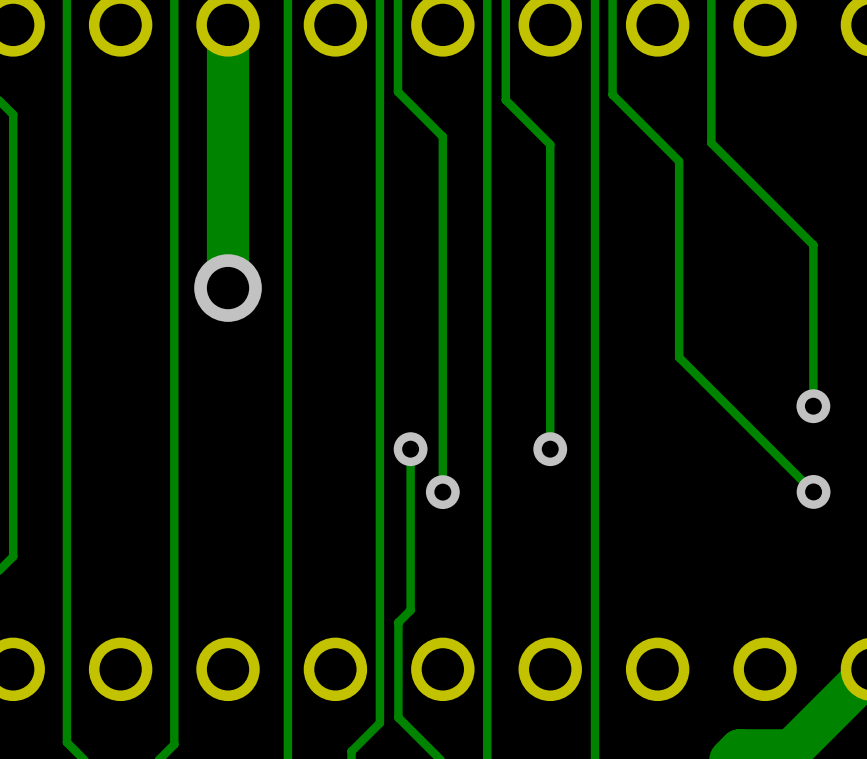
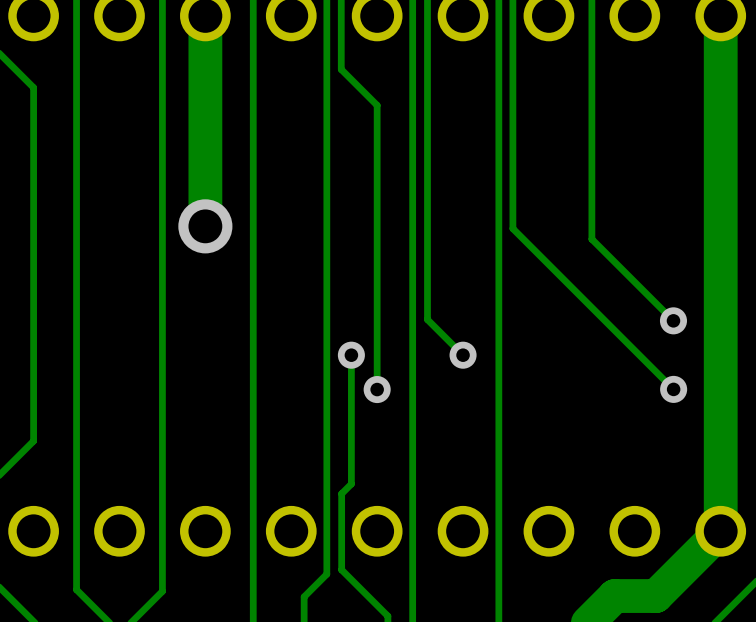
track: (612, 94) (679, 161) (679, 357) -> (512, 71) (512, 228) (566, 281)
track: (505, 100) (550, 144) (550, 449) -> (427, 76) (427, 319) (463, 355)
track: (711, 143) (813, 245) (813, 406) -> (591, 110) (591, 239) (673, 320)

